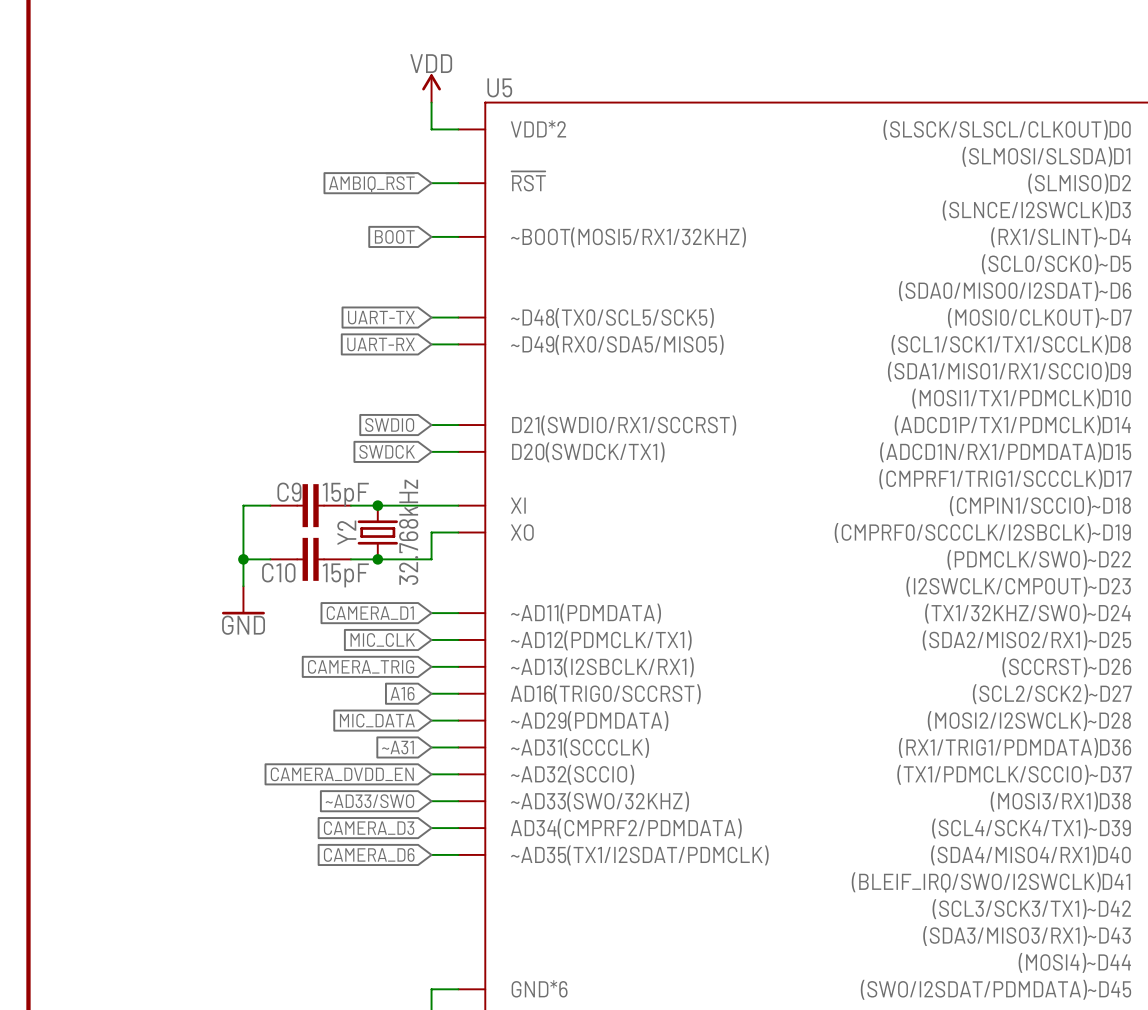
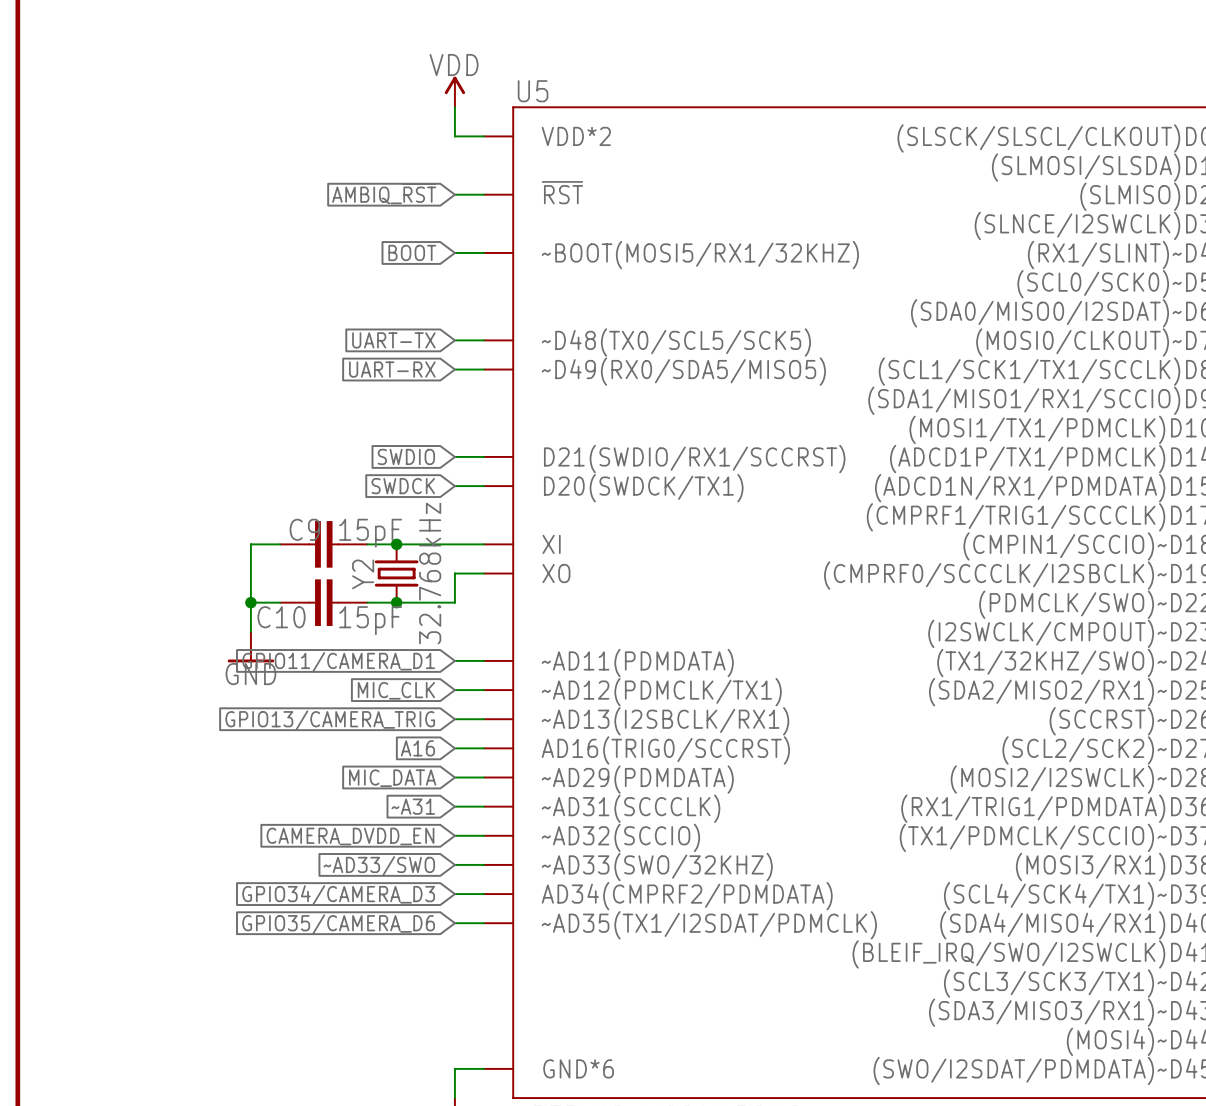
global label: CAMERA_D1 (370, 613) -> GPIO11/CAMERA_D1 (338, 662)
global label: CAMERA_TRIG (361, 666) -> GPIO13/CAMERA_TRIG (330, 720)
global label: CAMERA_D3 (369, 828) -> GPIO34/CAMERA_D3 (338, 895)
global label: CAMERA_D6 (369, 854) -> GPIO35/CAMERA_D6 (338, 924)

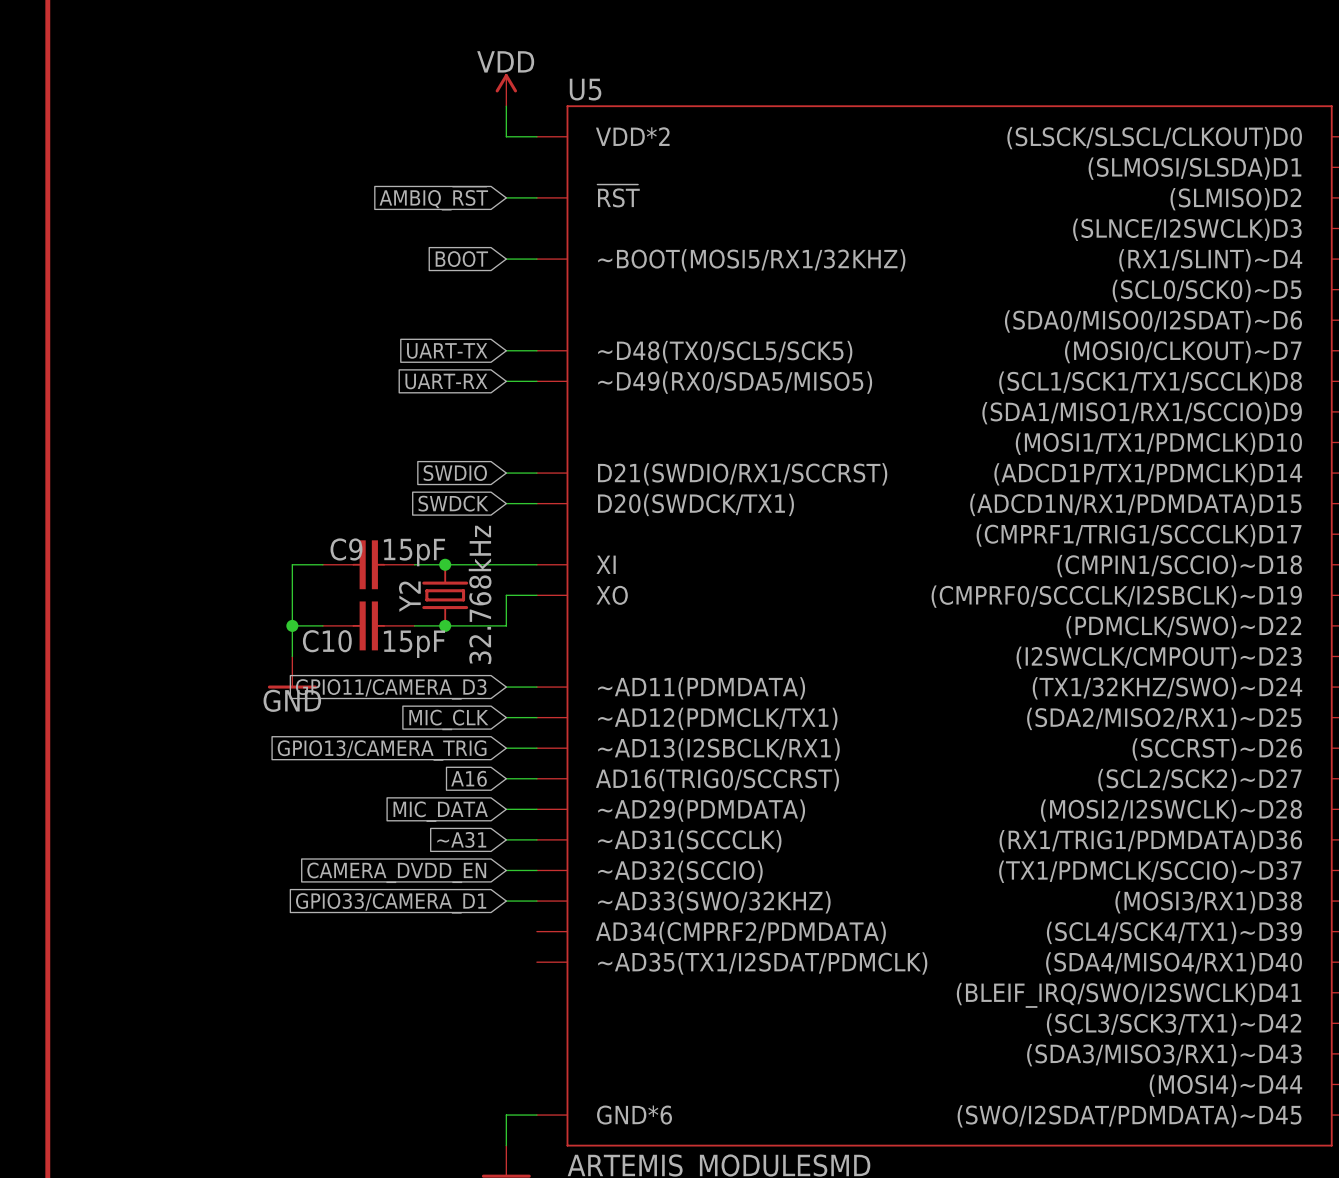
global label: GPIO11/CAMERA_D1 (338, 662) -> GPIO11/CAMERA_D3 (391, 689)
global label: ~AD33/SWO (379, 866) -> GPIO33/CAMERA_D1 (391, 903)
wire: (454, 894) (484, 894) -> none
global label: GPIO34/CAMERA_D3 (338, 895) -> none
wire: (454, 923) (484, 923) -> none
global label: GPIO35/CAMERA_D6 (338, 924) -> none

